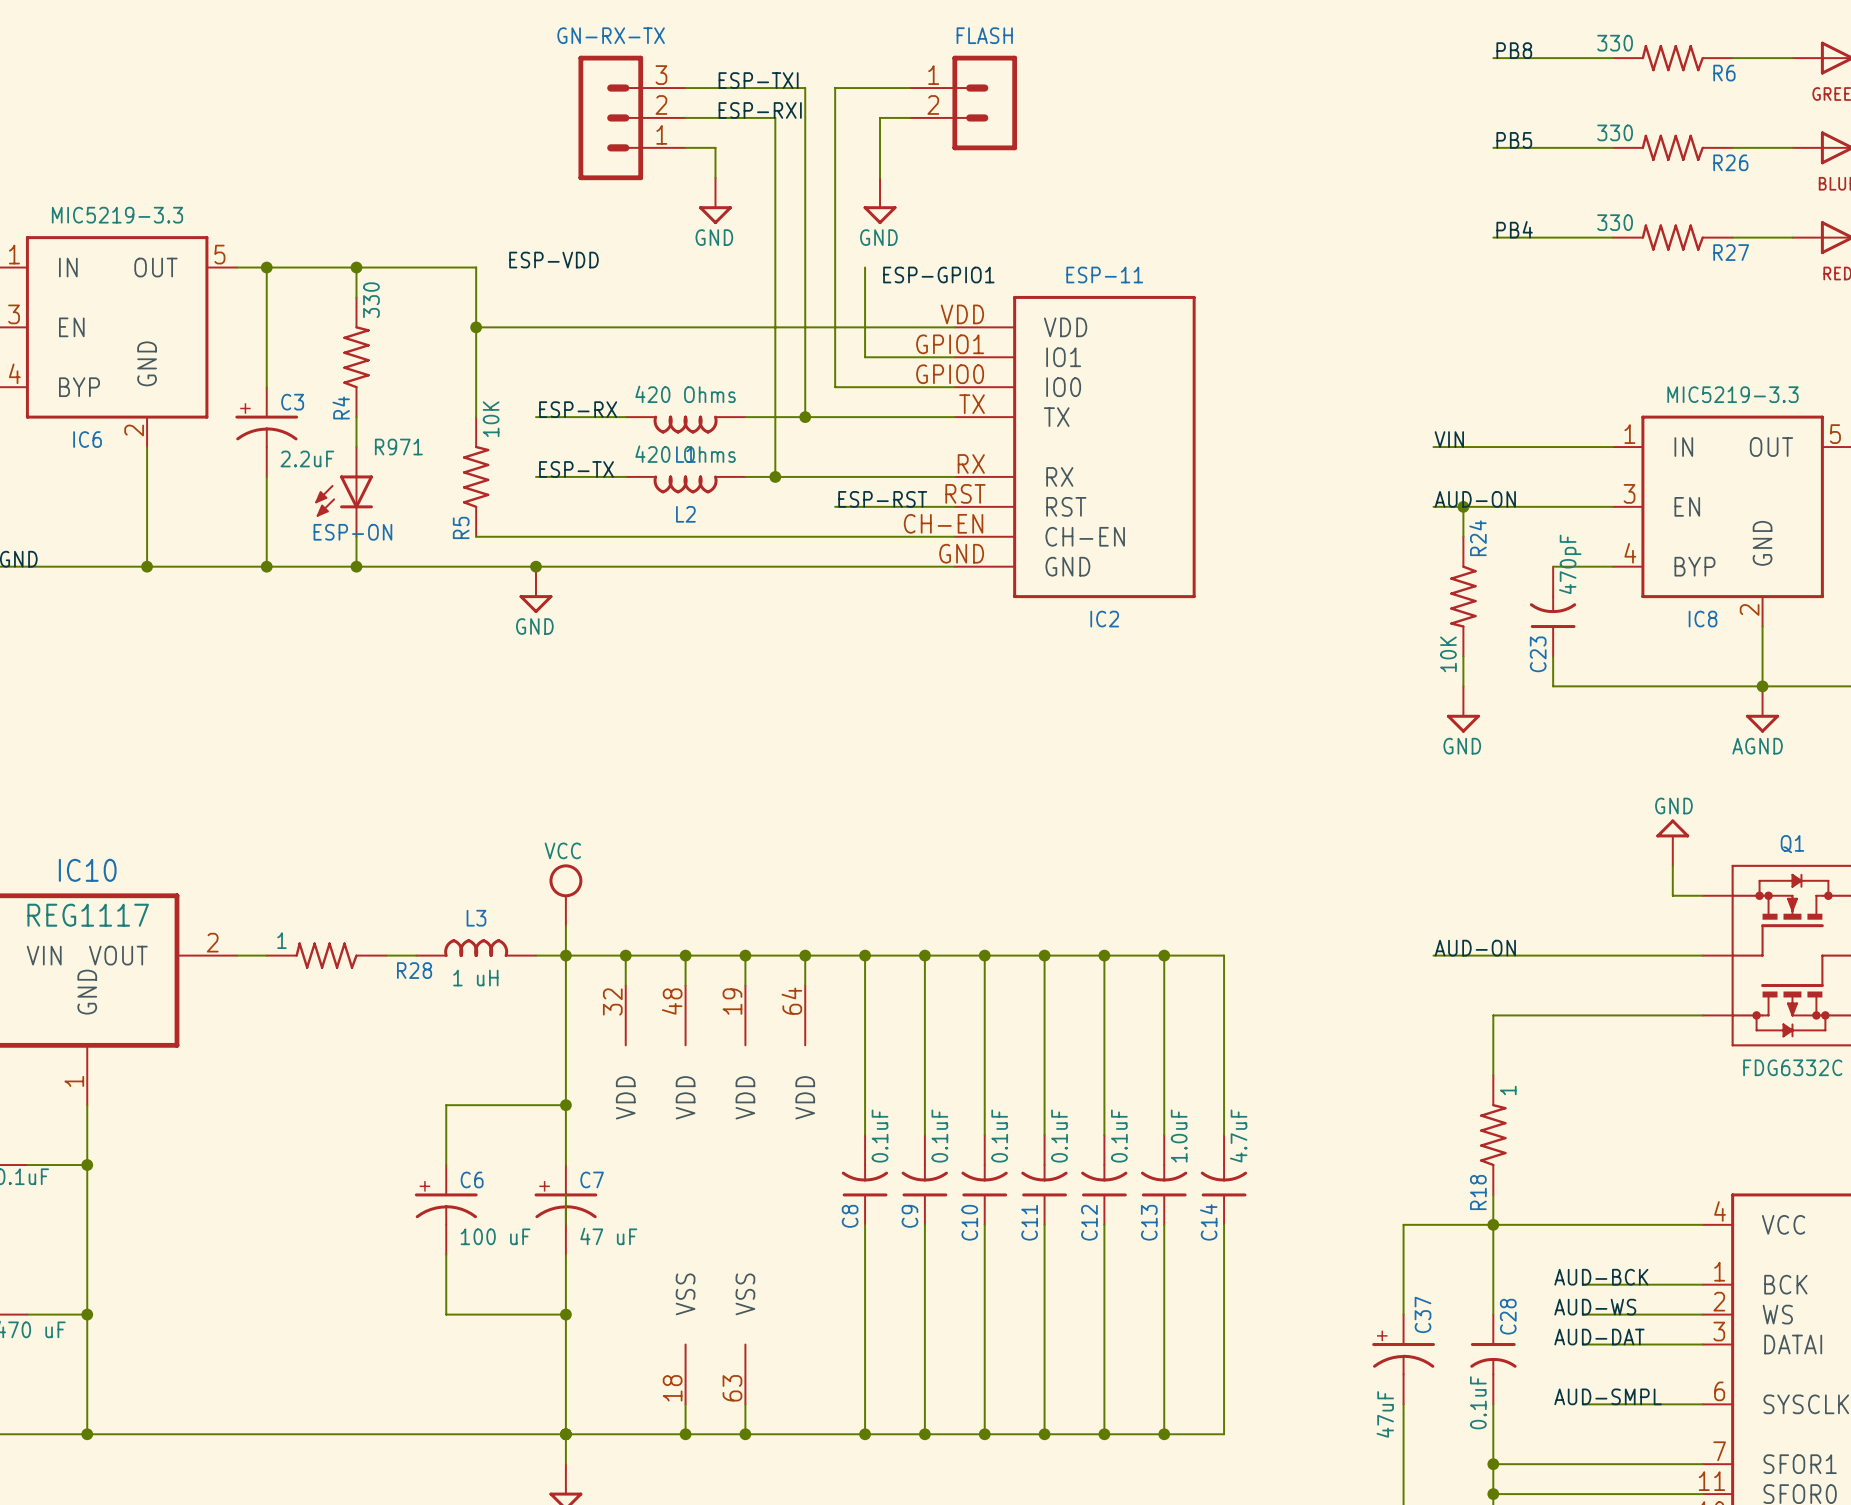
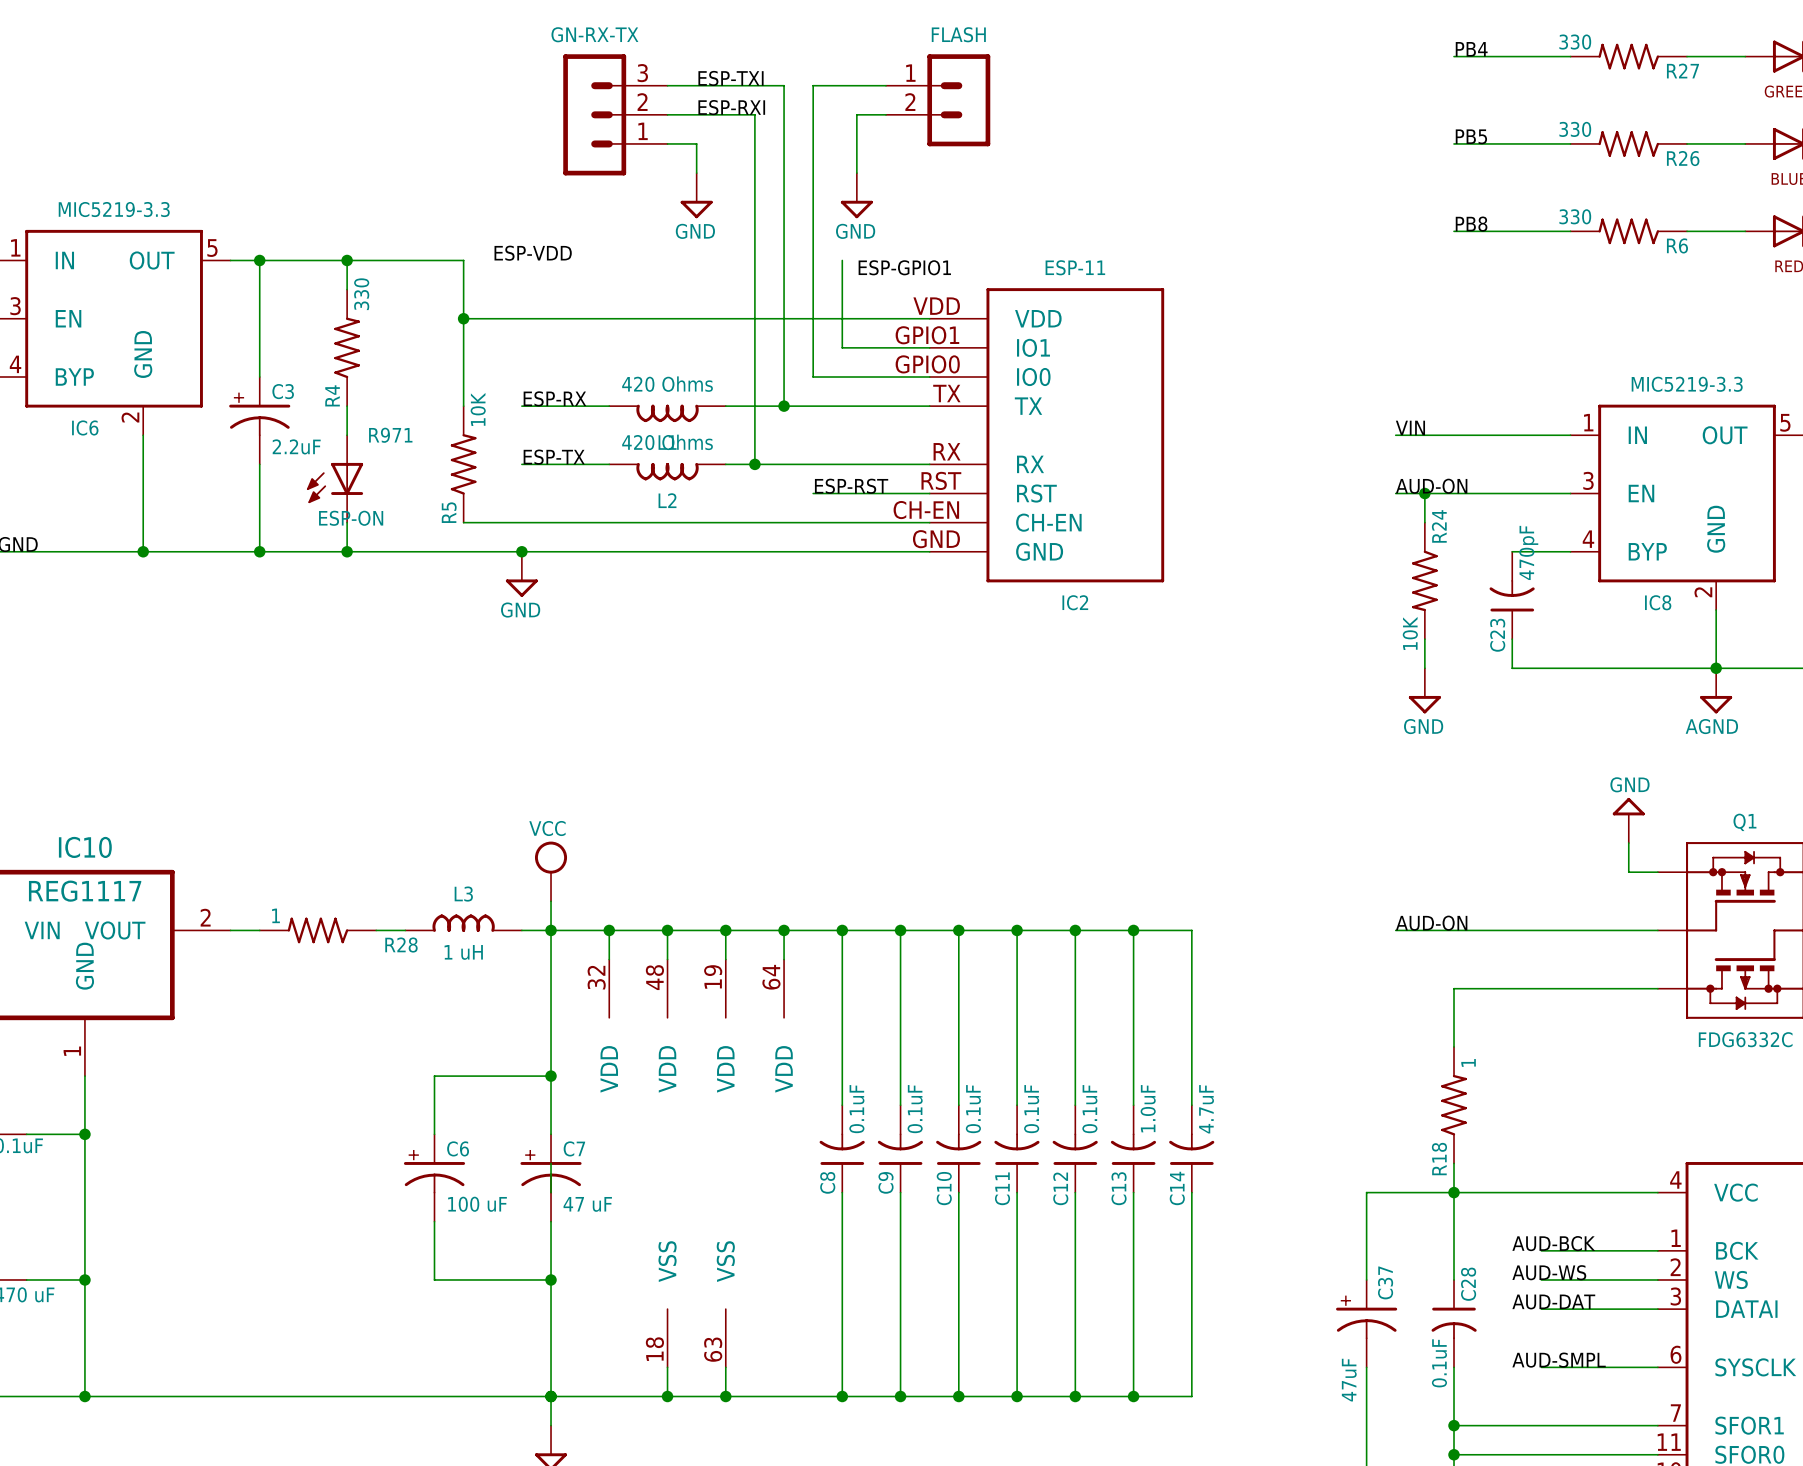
label: PB8 (1514, 50) -> PB4 (1471, 49)
R6 name: R6 (1724, 73) -> R27 (1682, 71)
label: PB4 (1514, 229) -> PB8 (1471, 224)
R27 name: R27 (1731, 252) -> R6 (1677, 245)

